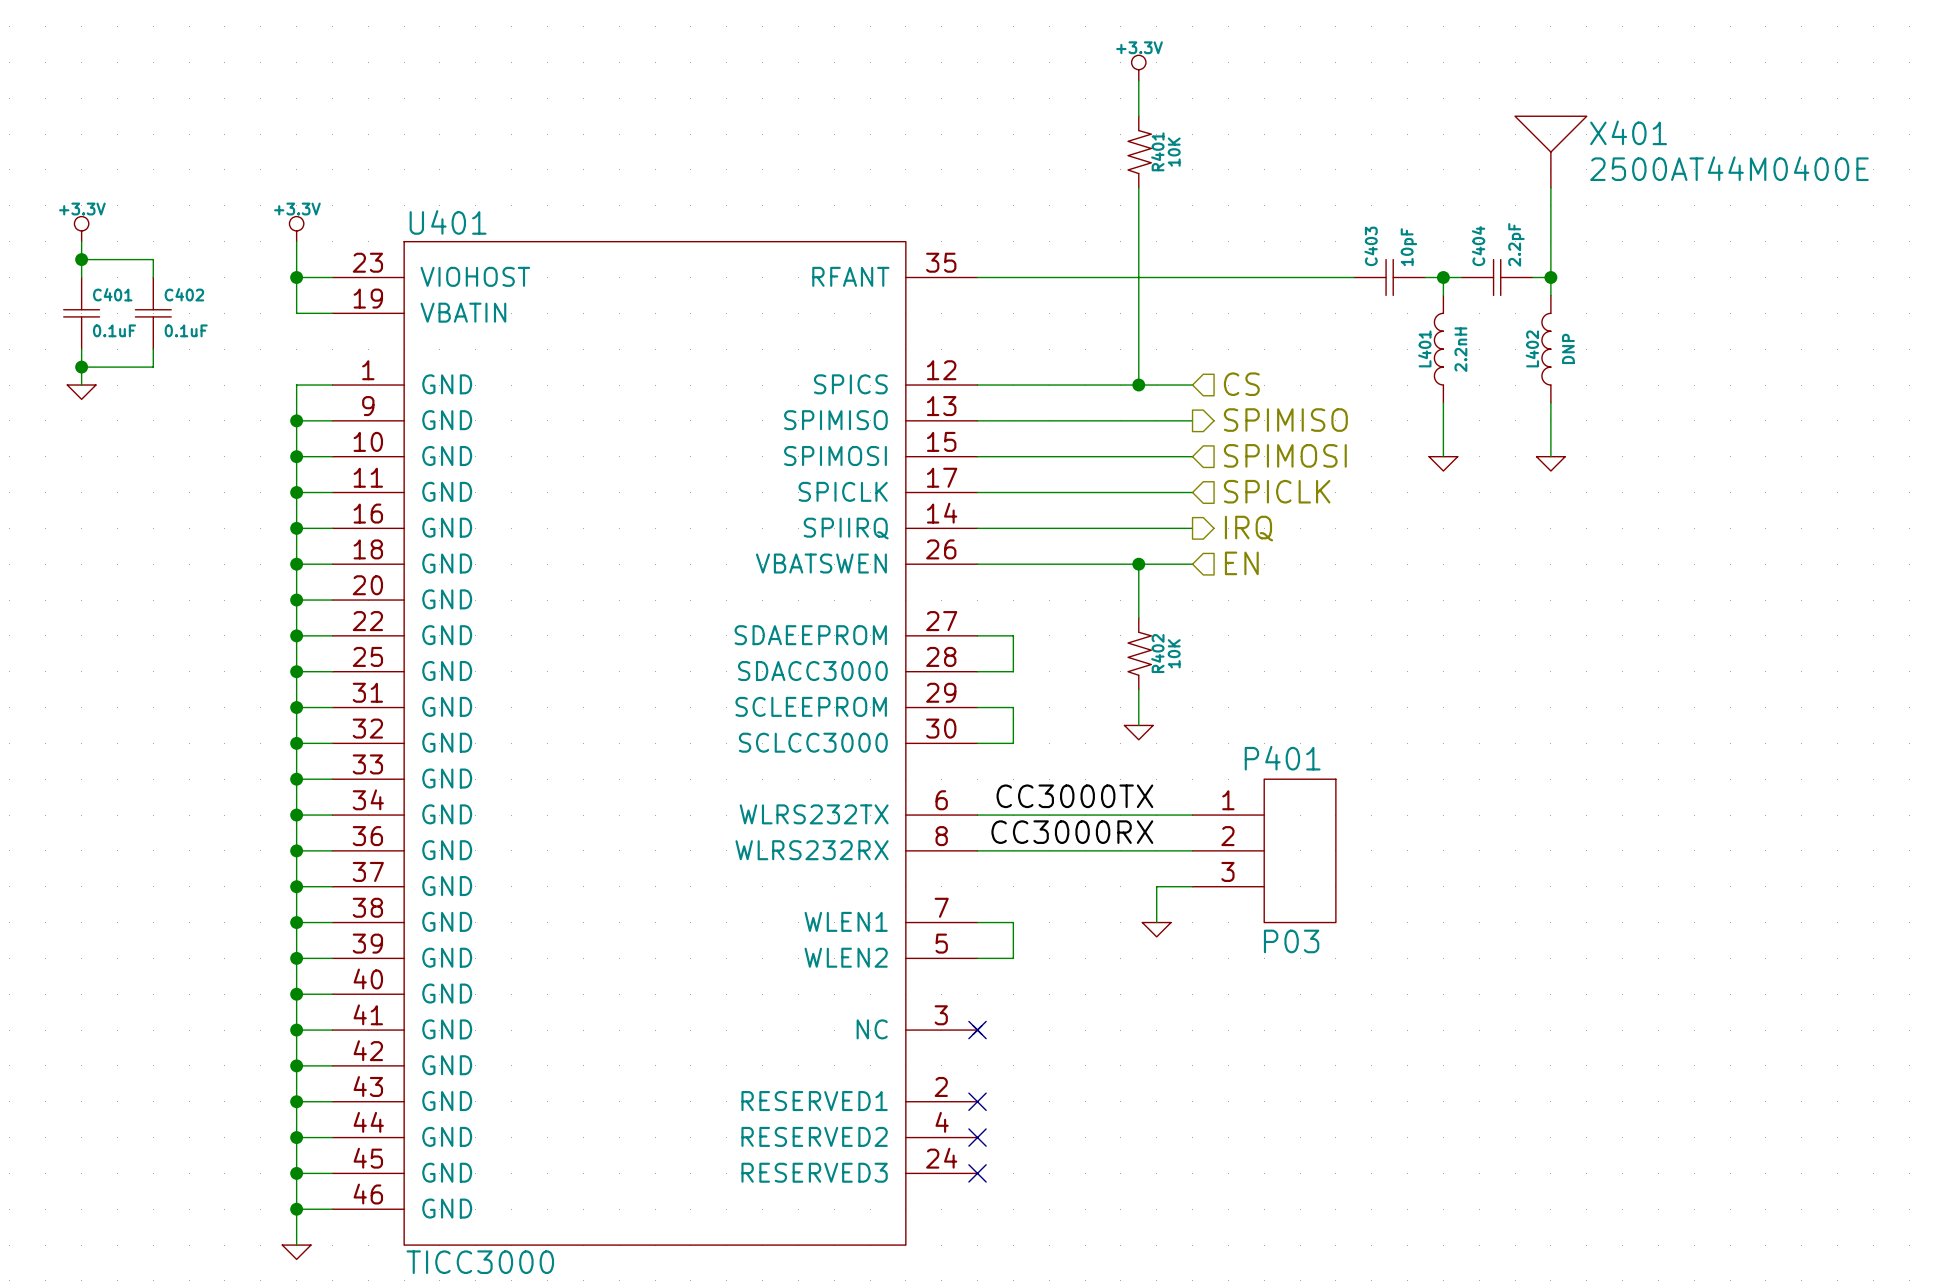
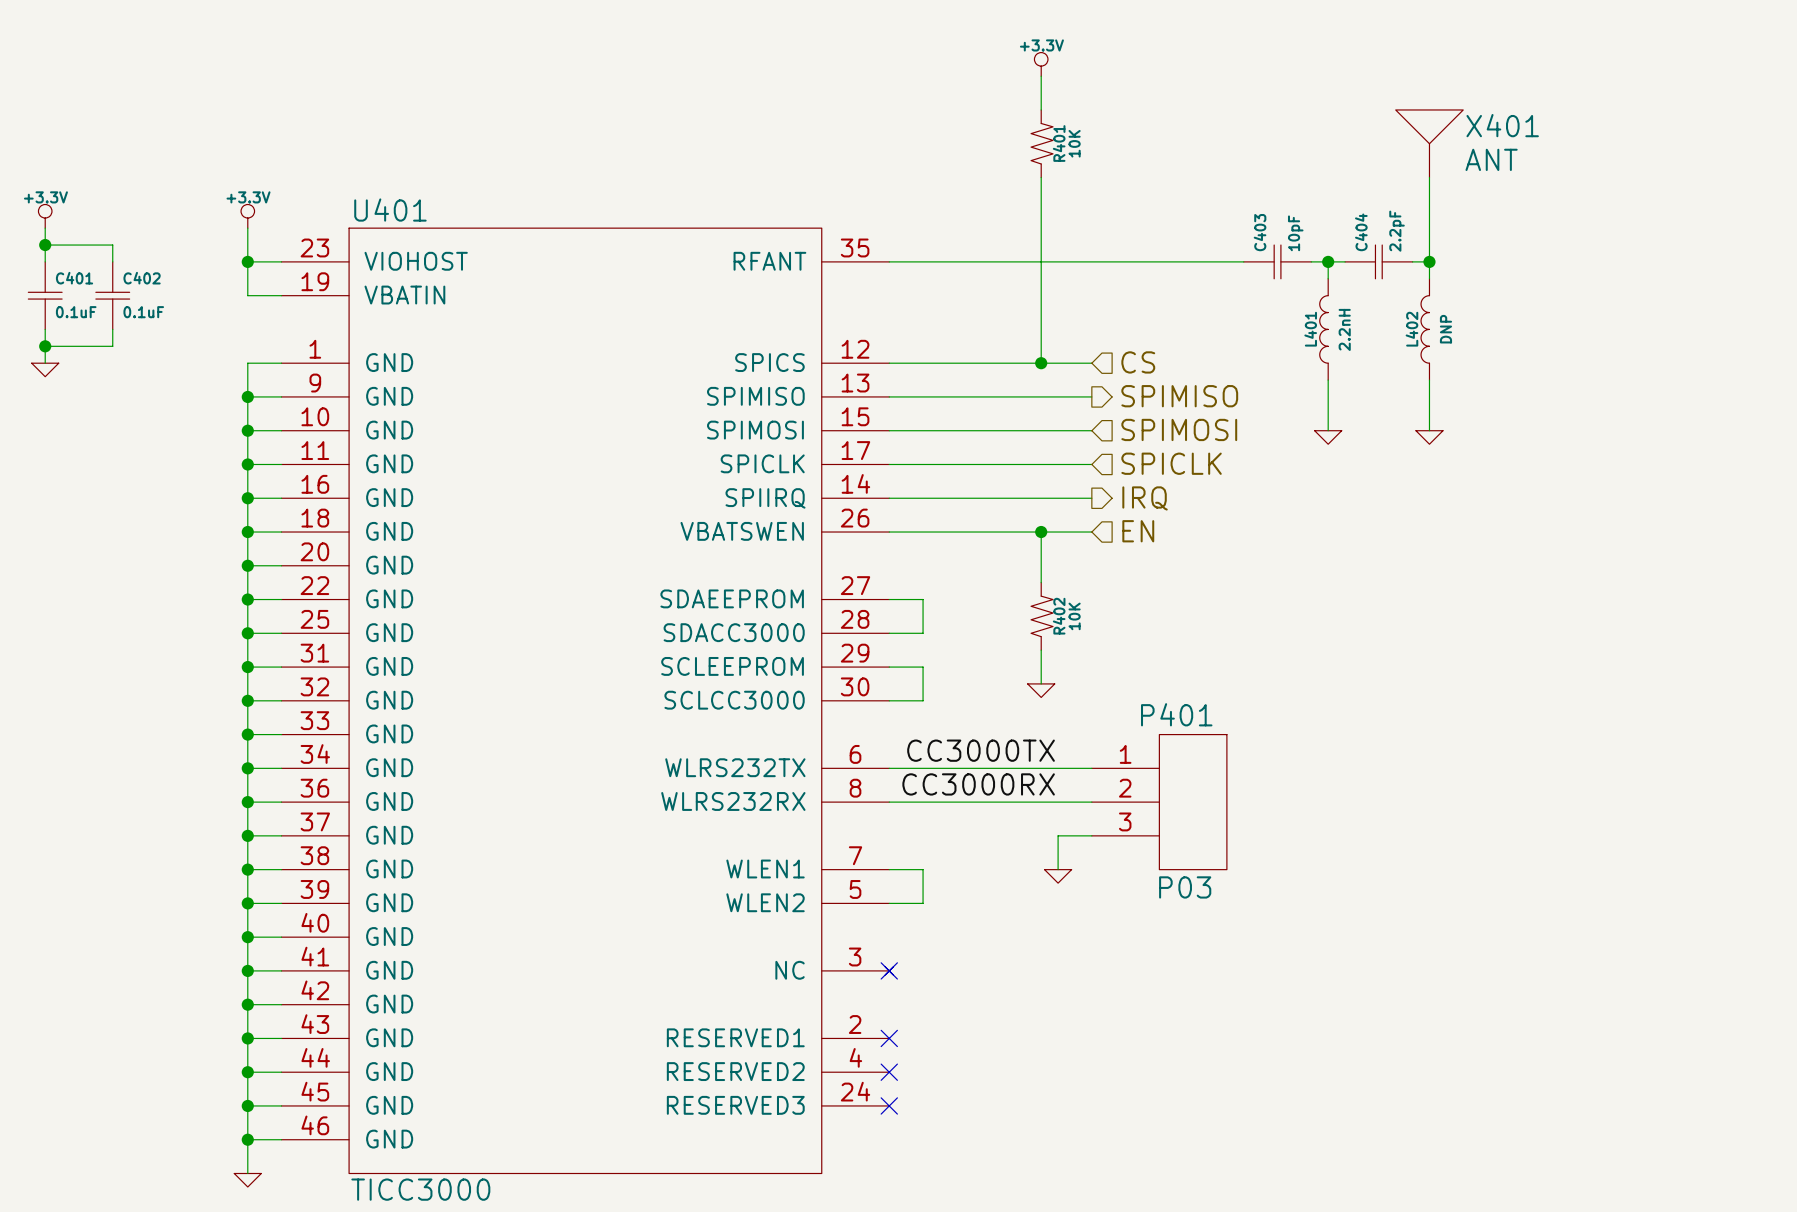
X401 value: 2500AT44M0400E (1729, 168) -> ANT (1491, 159)

